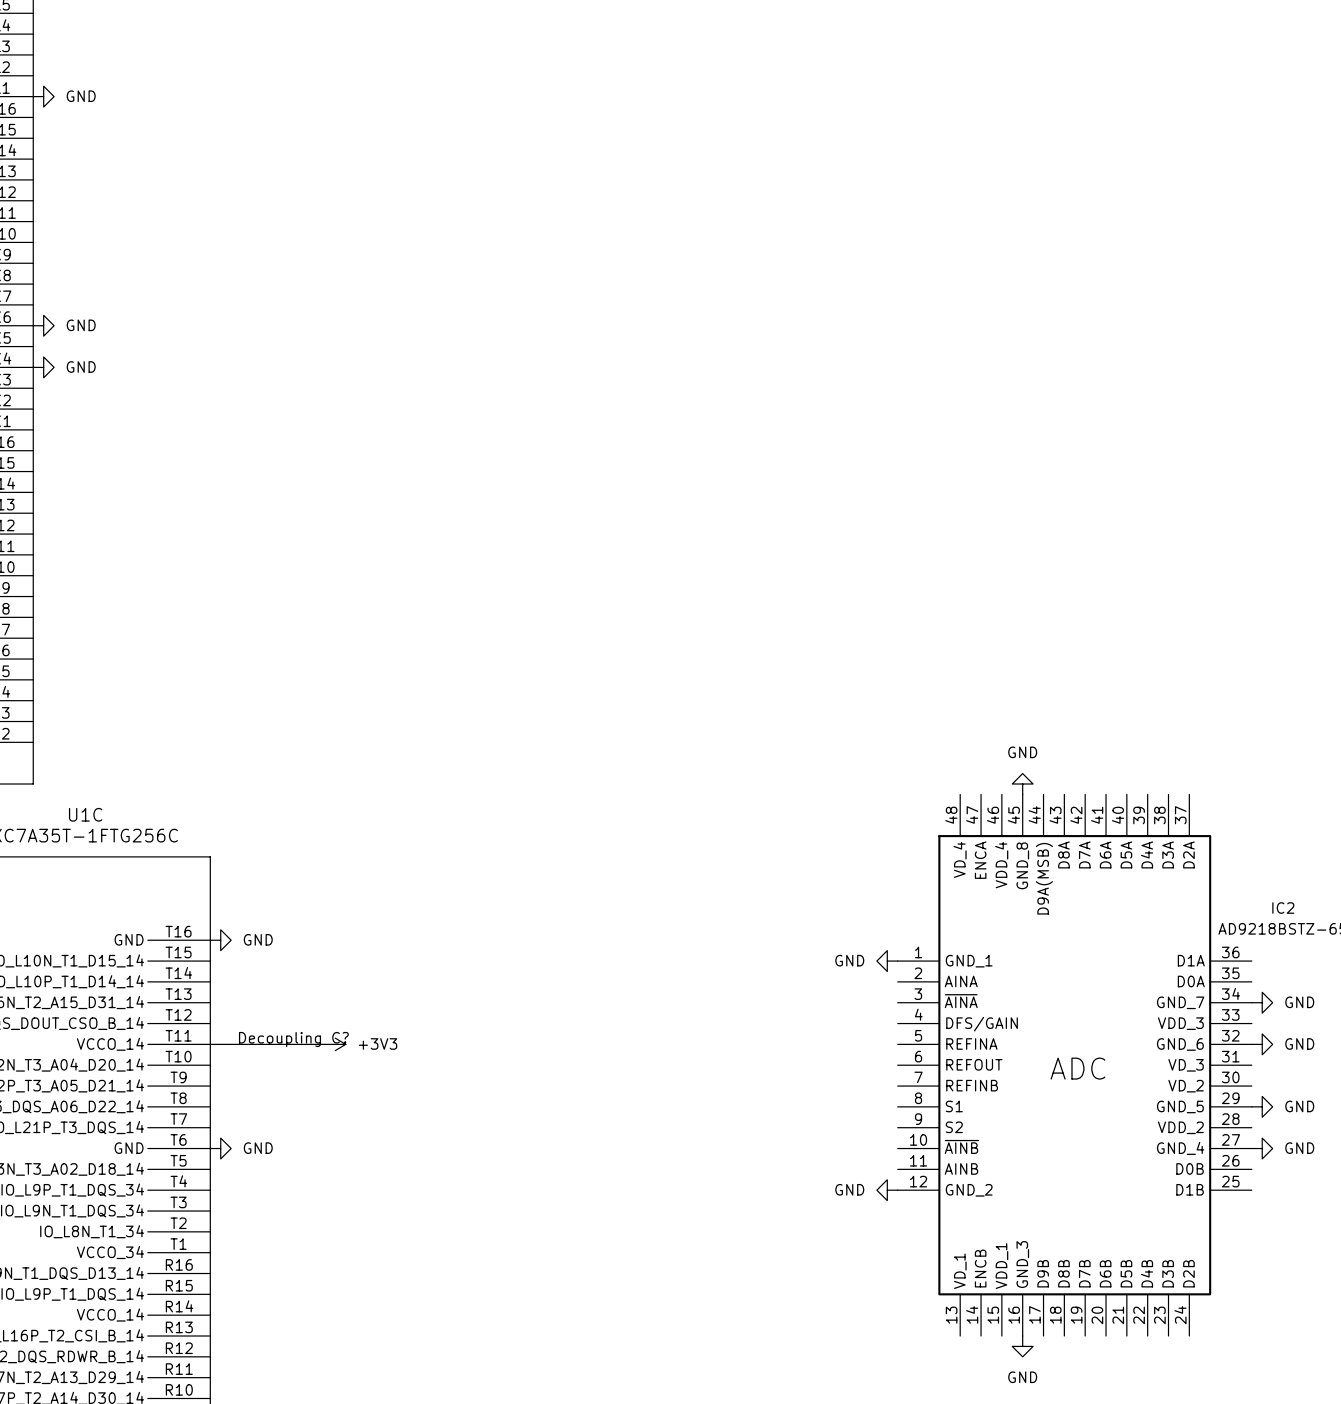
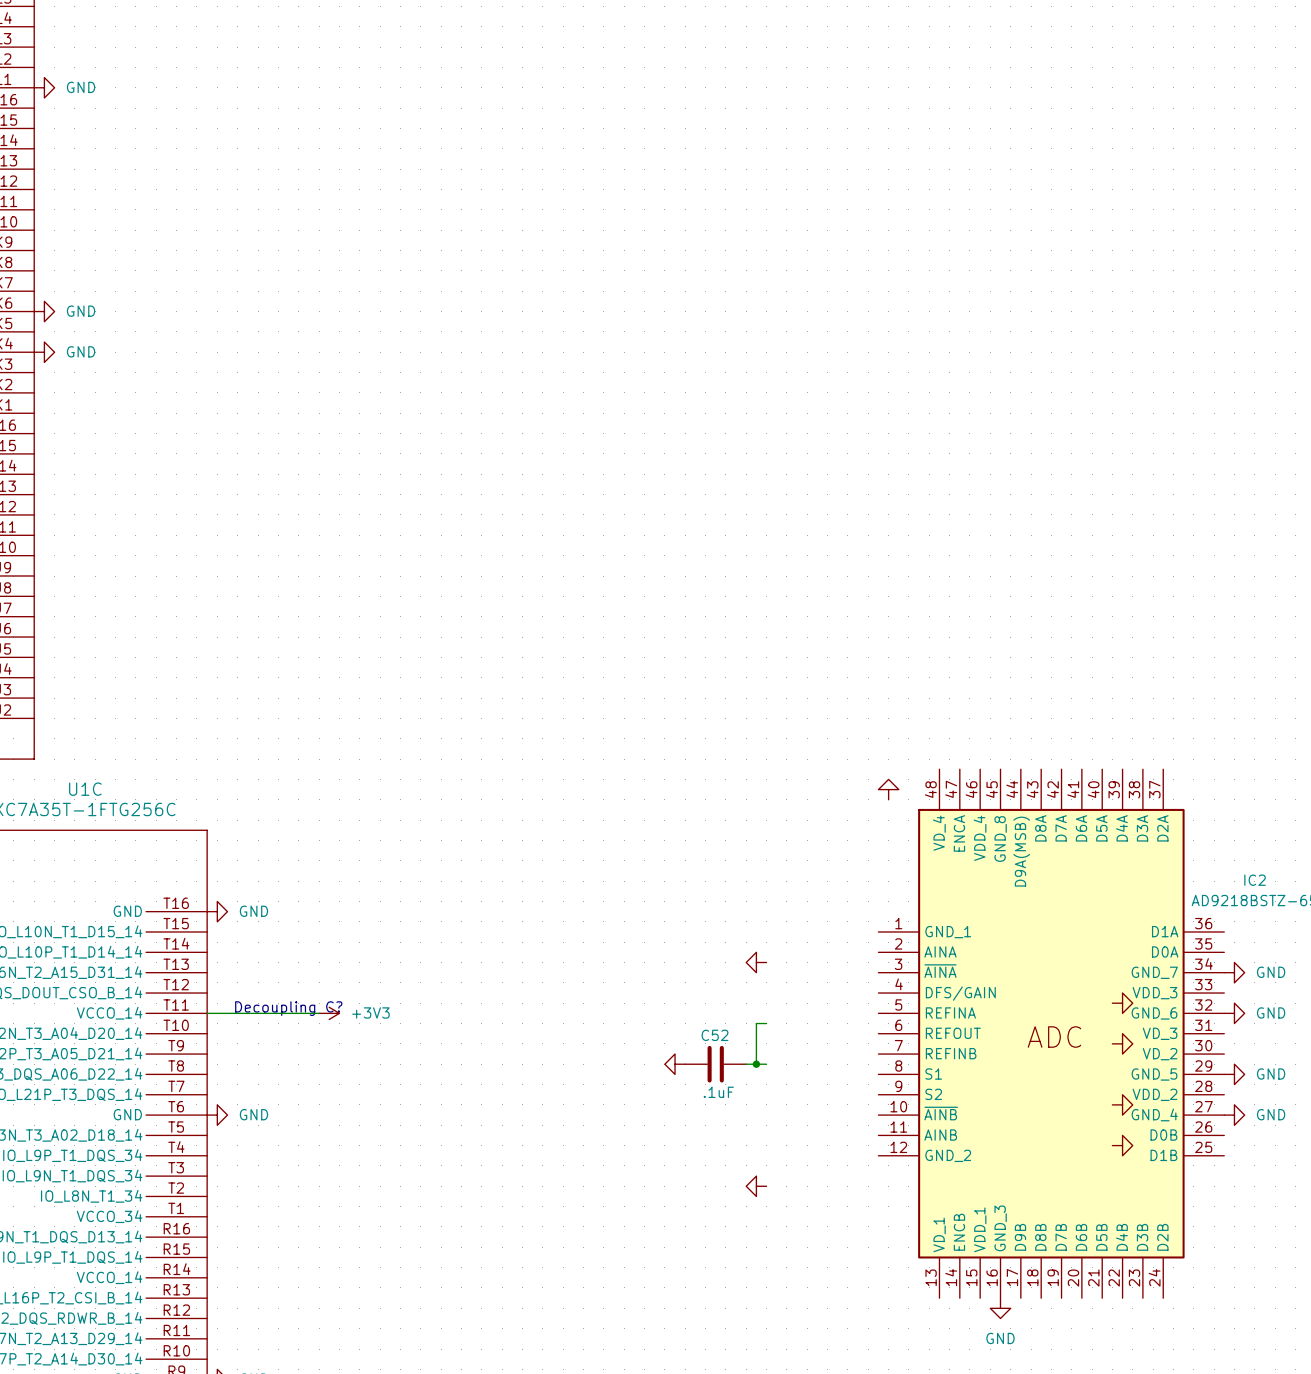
power symbol: GND (1022, 784) -> none
power symbol: none -> (888, 789)
power symbol: GND (887, 961) -> none
power symbol: none -> (756, 962)
power symbol: none -> (1122, 1003)
wire: none -> (766, 1023) (756, 1023) (756, 1064)
power symbol: none -> (1122, 1043)
power symbol: none -> (675, 1064)
C52: none -> .1uF (715, 1064)
wire: none -> (746, 1064) (766, 1064)
junction: none -> (756, 1064)
power symbol: none -> (1122, 1104)
power symbol: none -> (1122, 1145)
power symbol: GND (887, 1190) -> none
power symbol: none -> (756, 1186)

